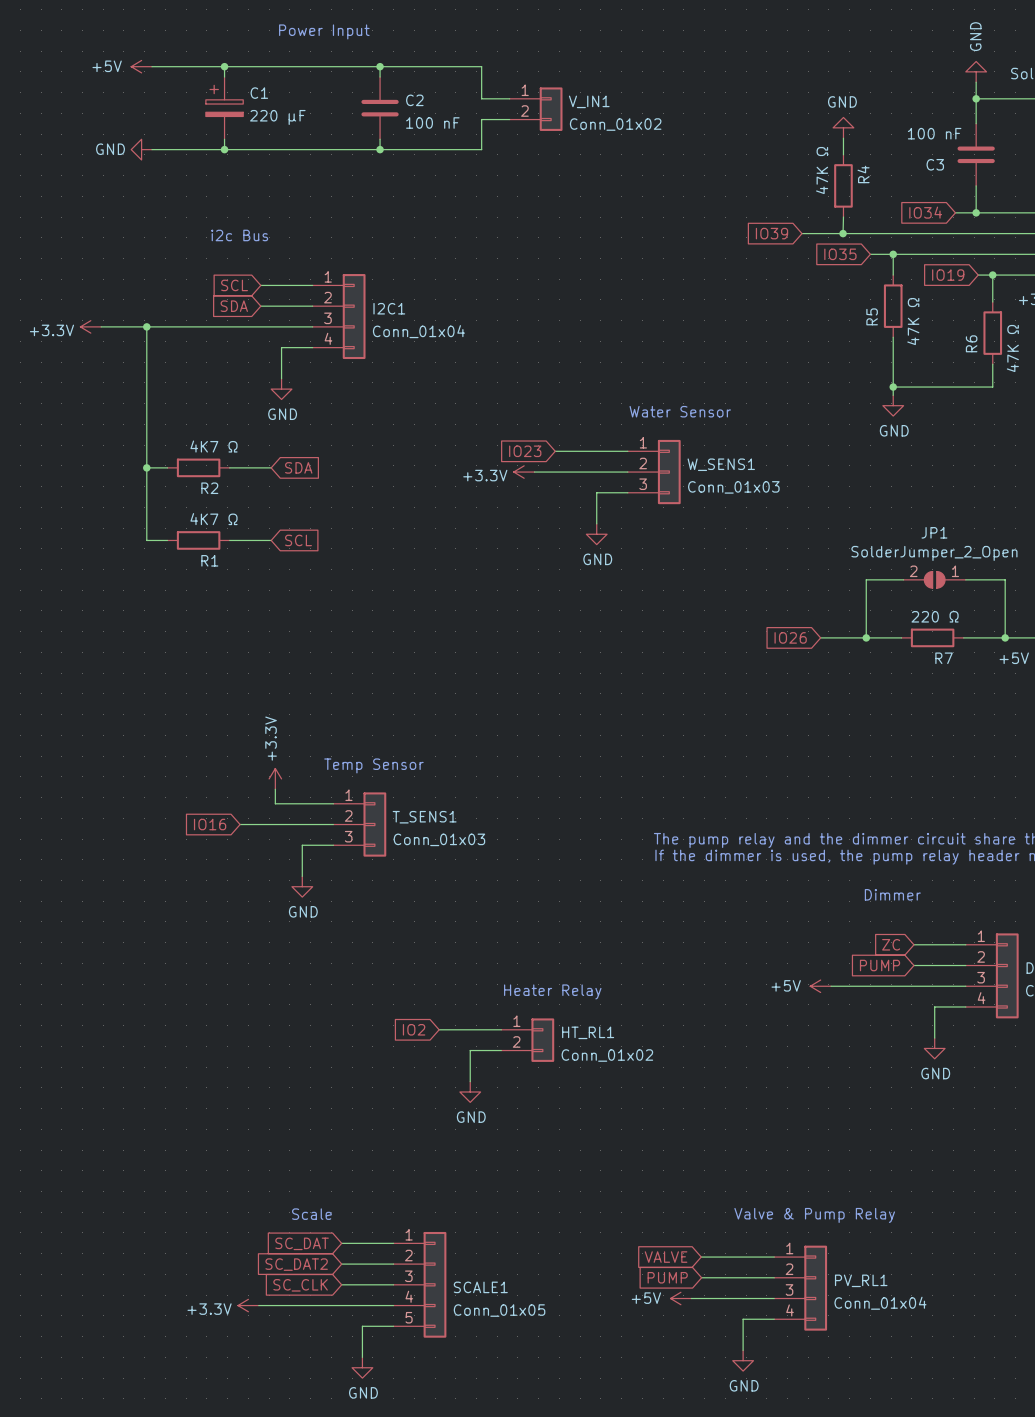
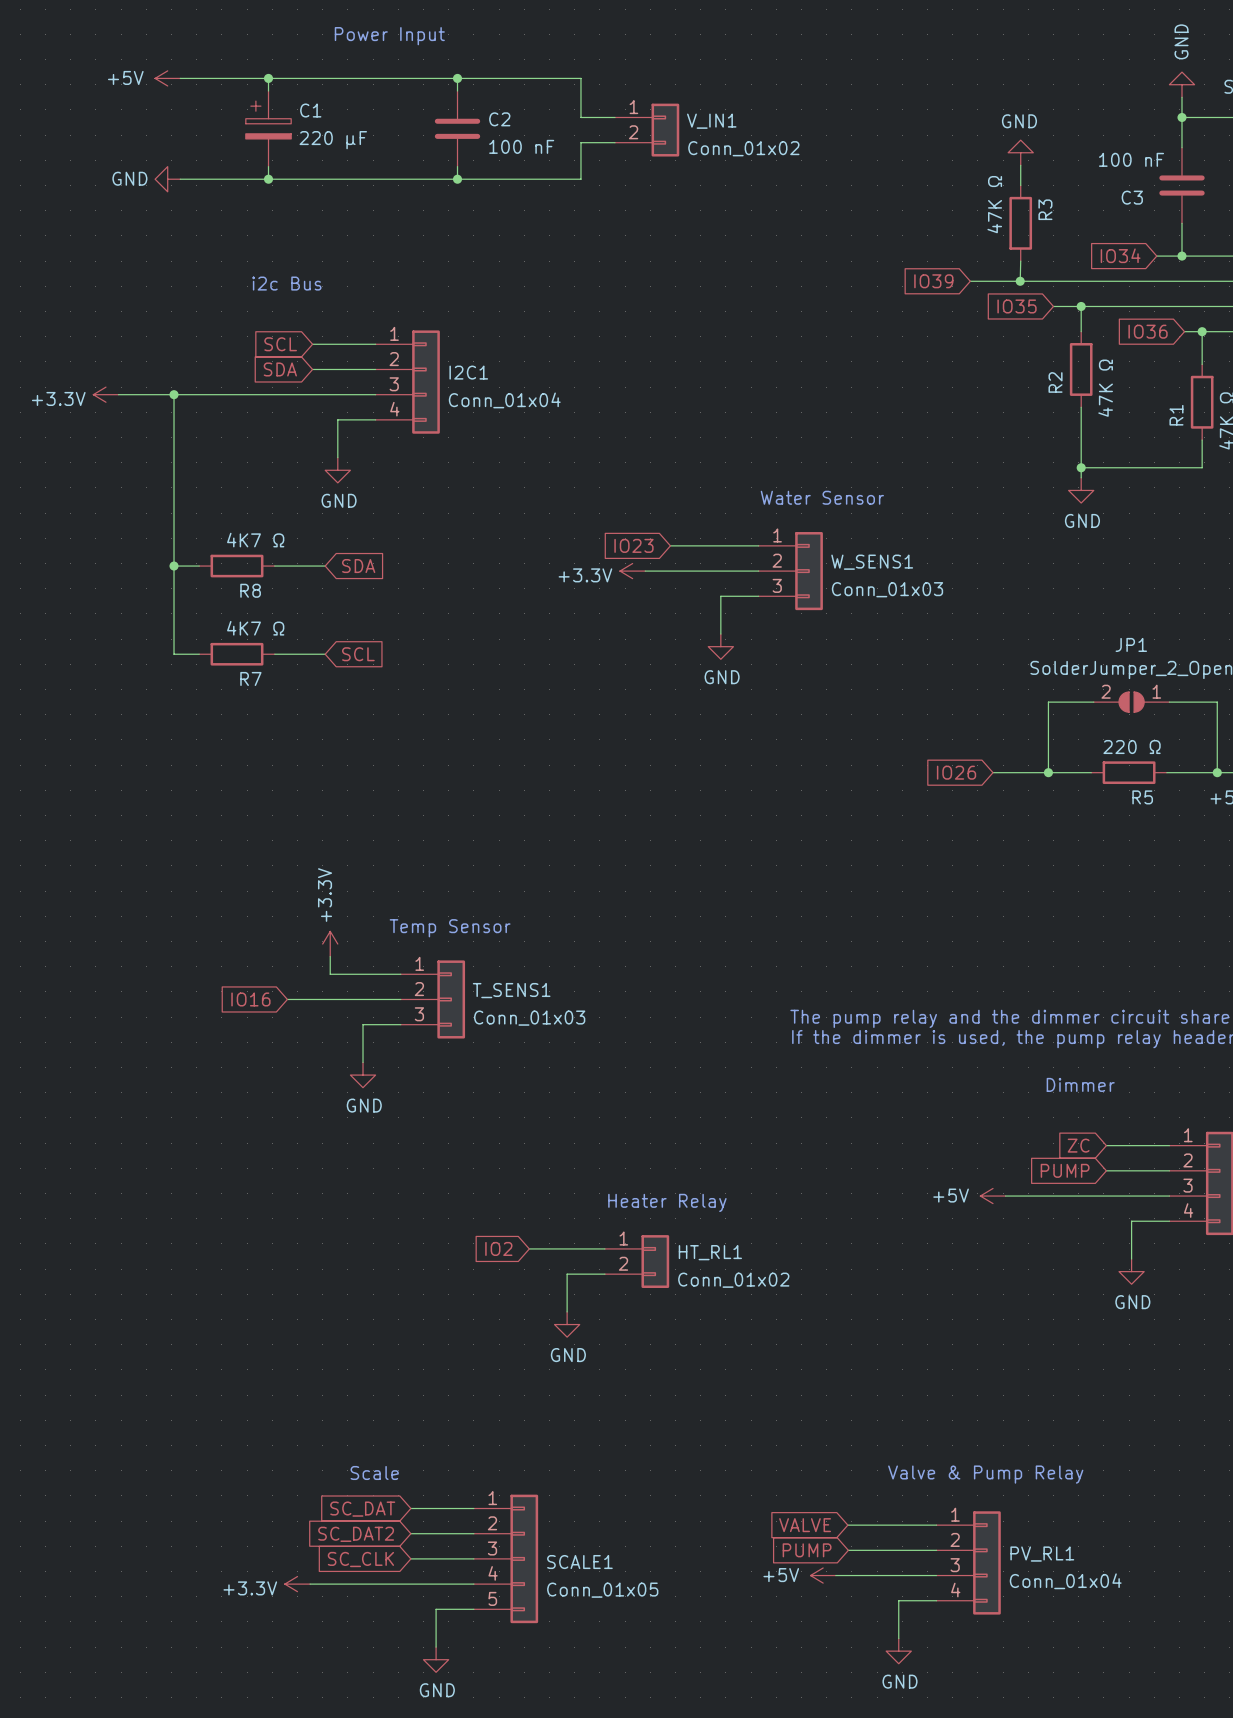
R4 name: R4 (863, 174) -> R3 (1045, 209)
global label: IO19 (948, 275) -> IO36 (1148, 331)
R5 name: R5 (872, 316) -> R2 (1055, 382)
R6 name: R6 (971, 343) -> R1 (1176, 415)
R2 name: R2 (209, 488) -> R8 (250, 590)
R1 name: R1 (209, 560) -> R7 (250, 678)
R7 name: R7 (944, 658) -> R5 (1142, 797)

